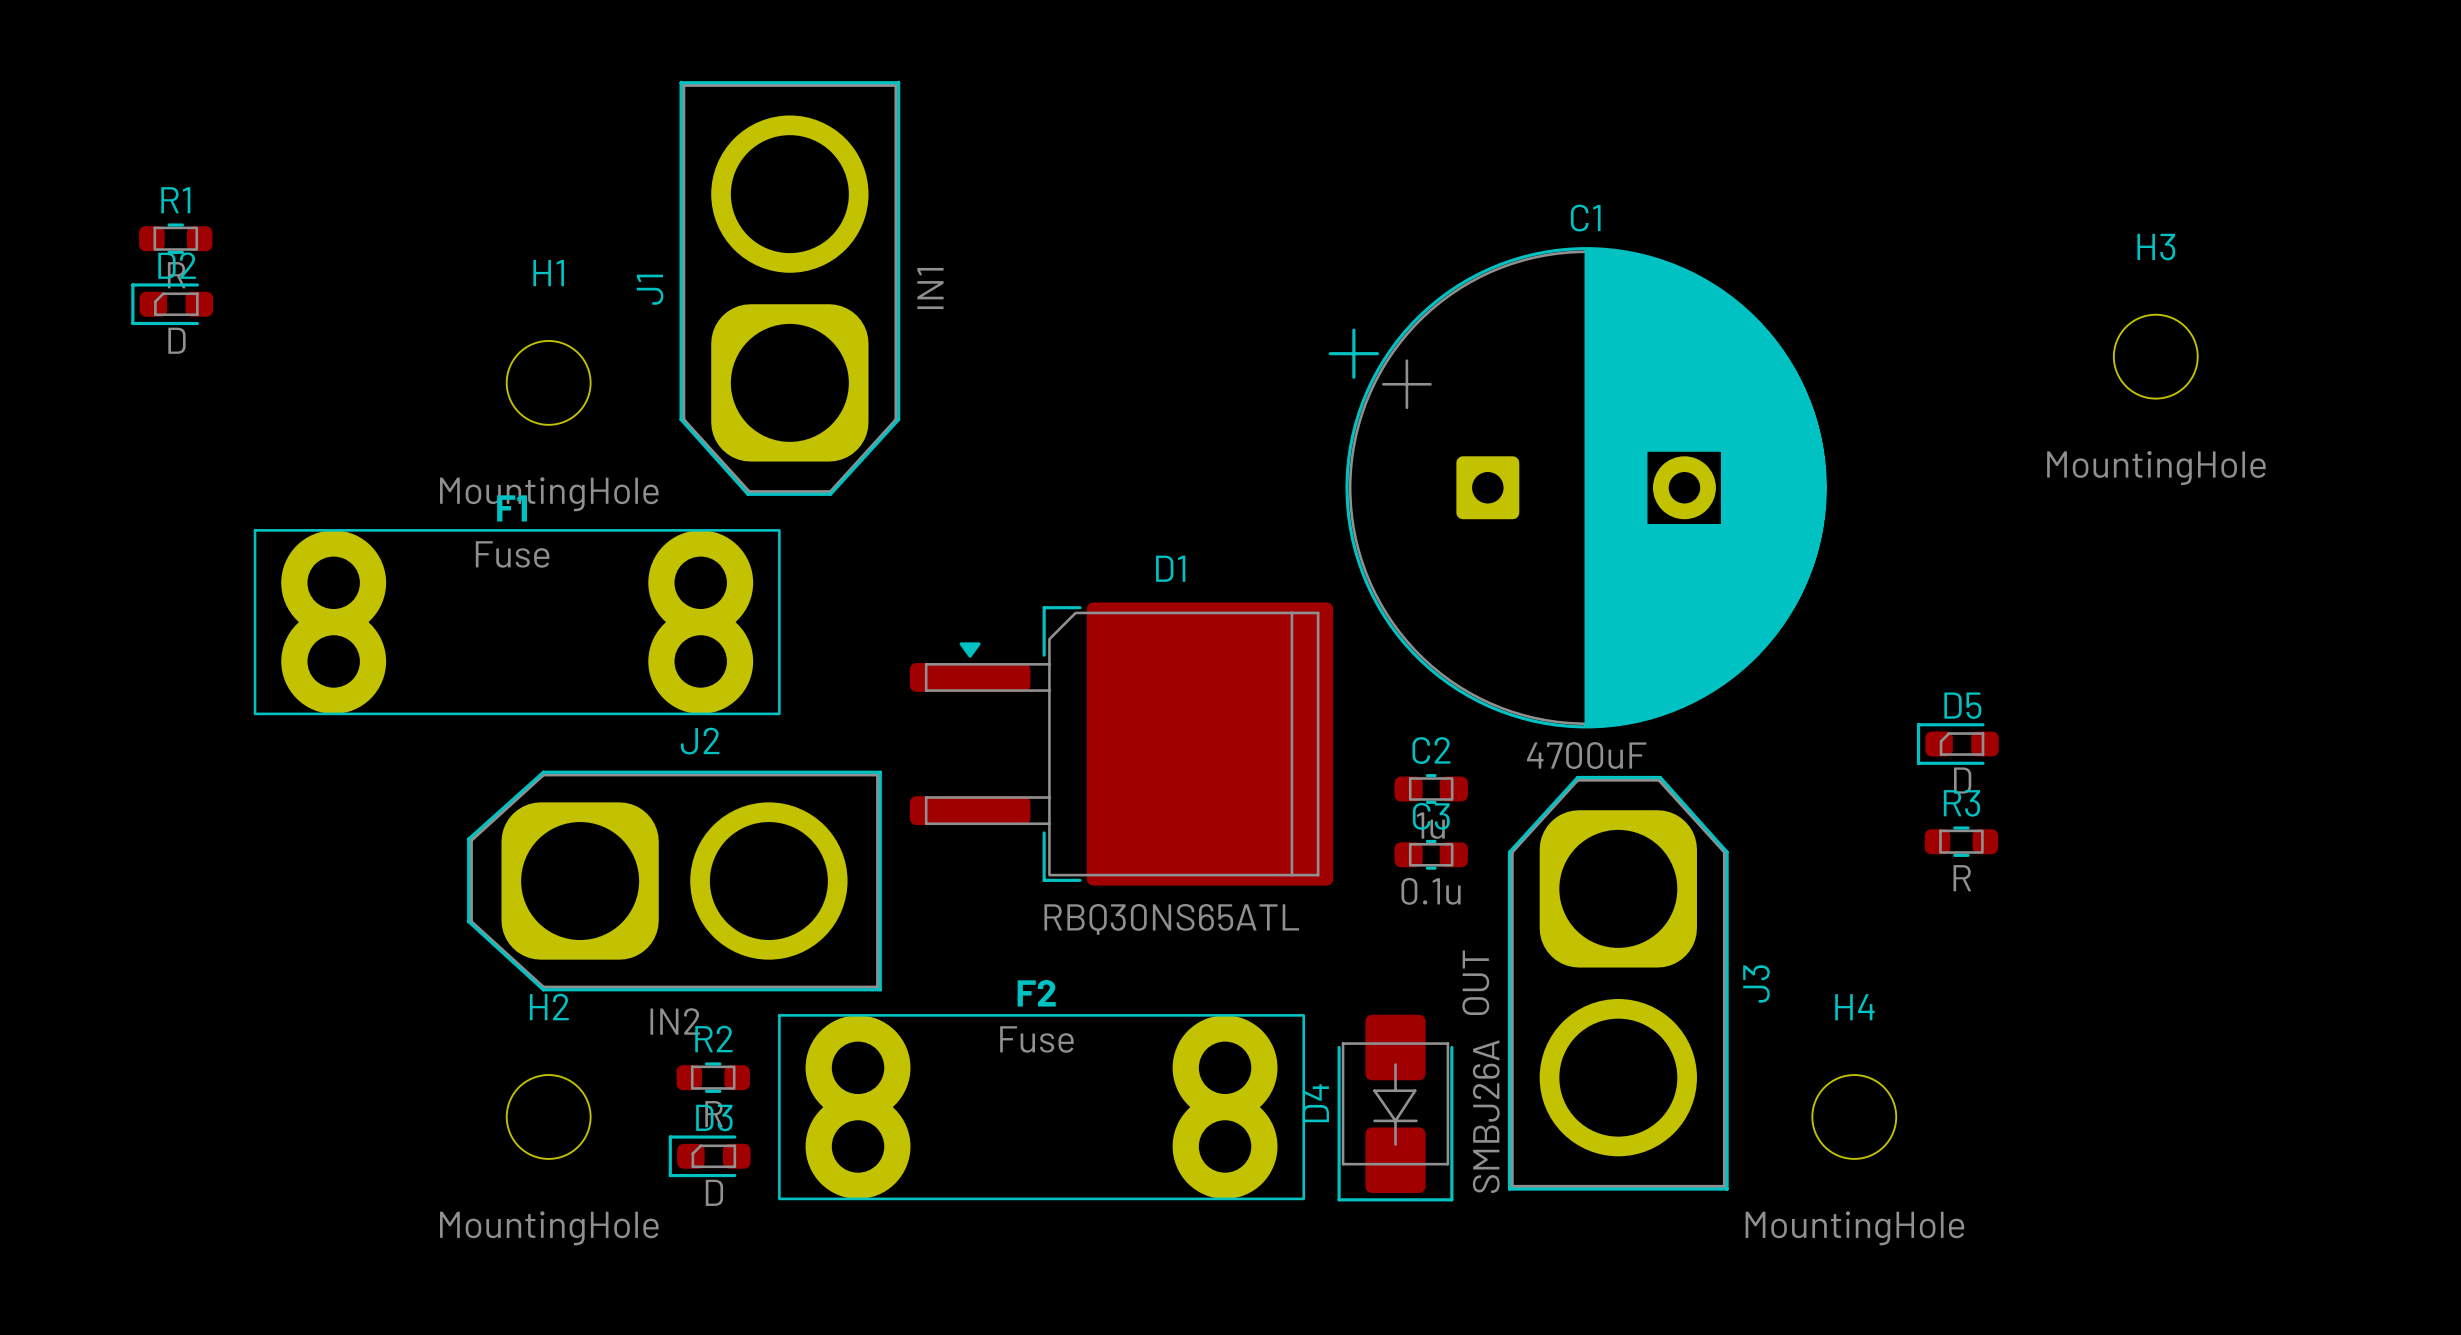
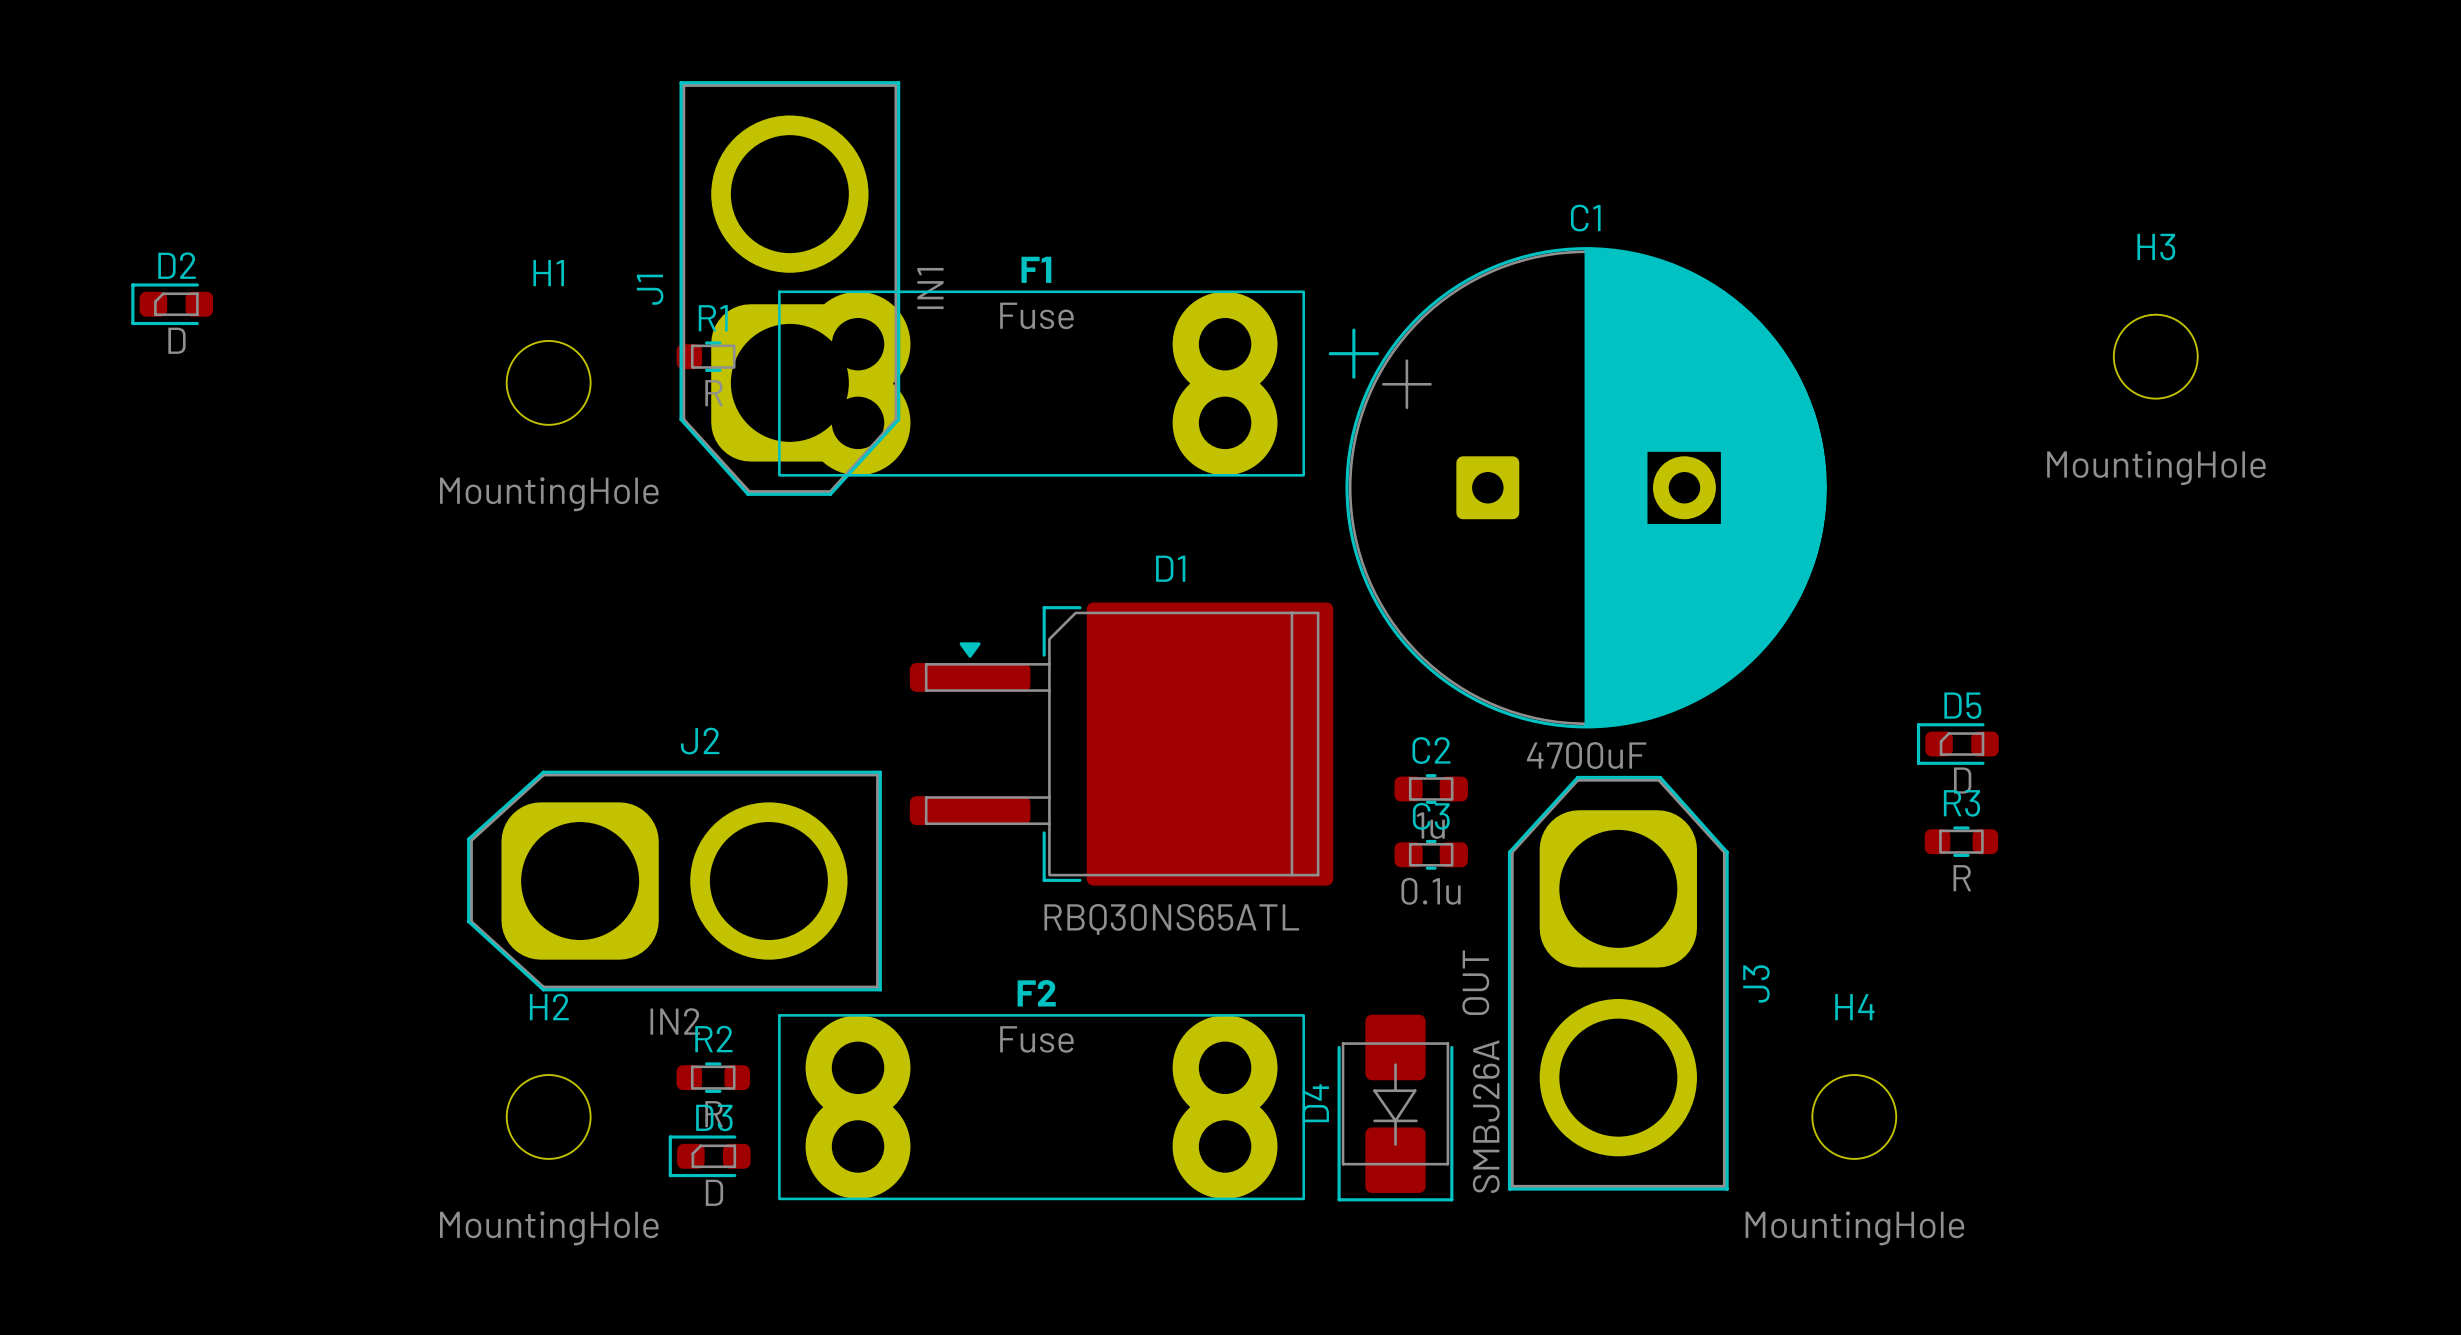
R1 position: (175, 238) -> (713, 356)
F1 position: (517, 622) -> (1041, 383)

